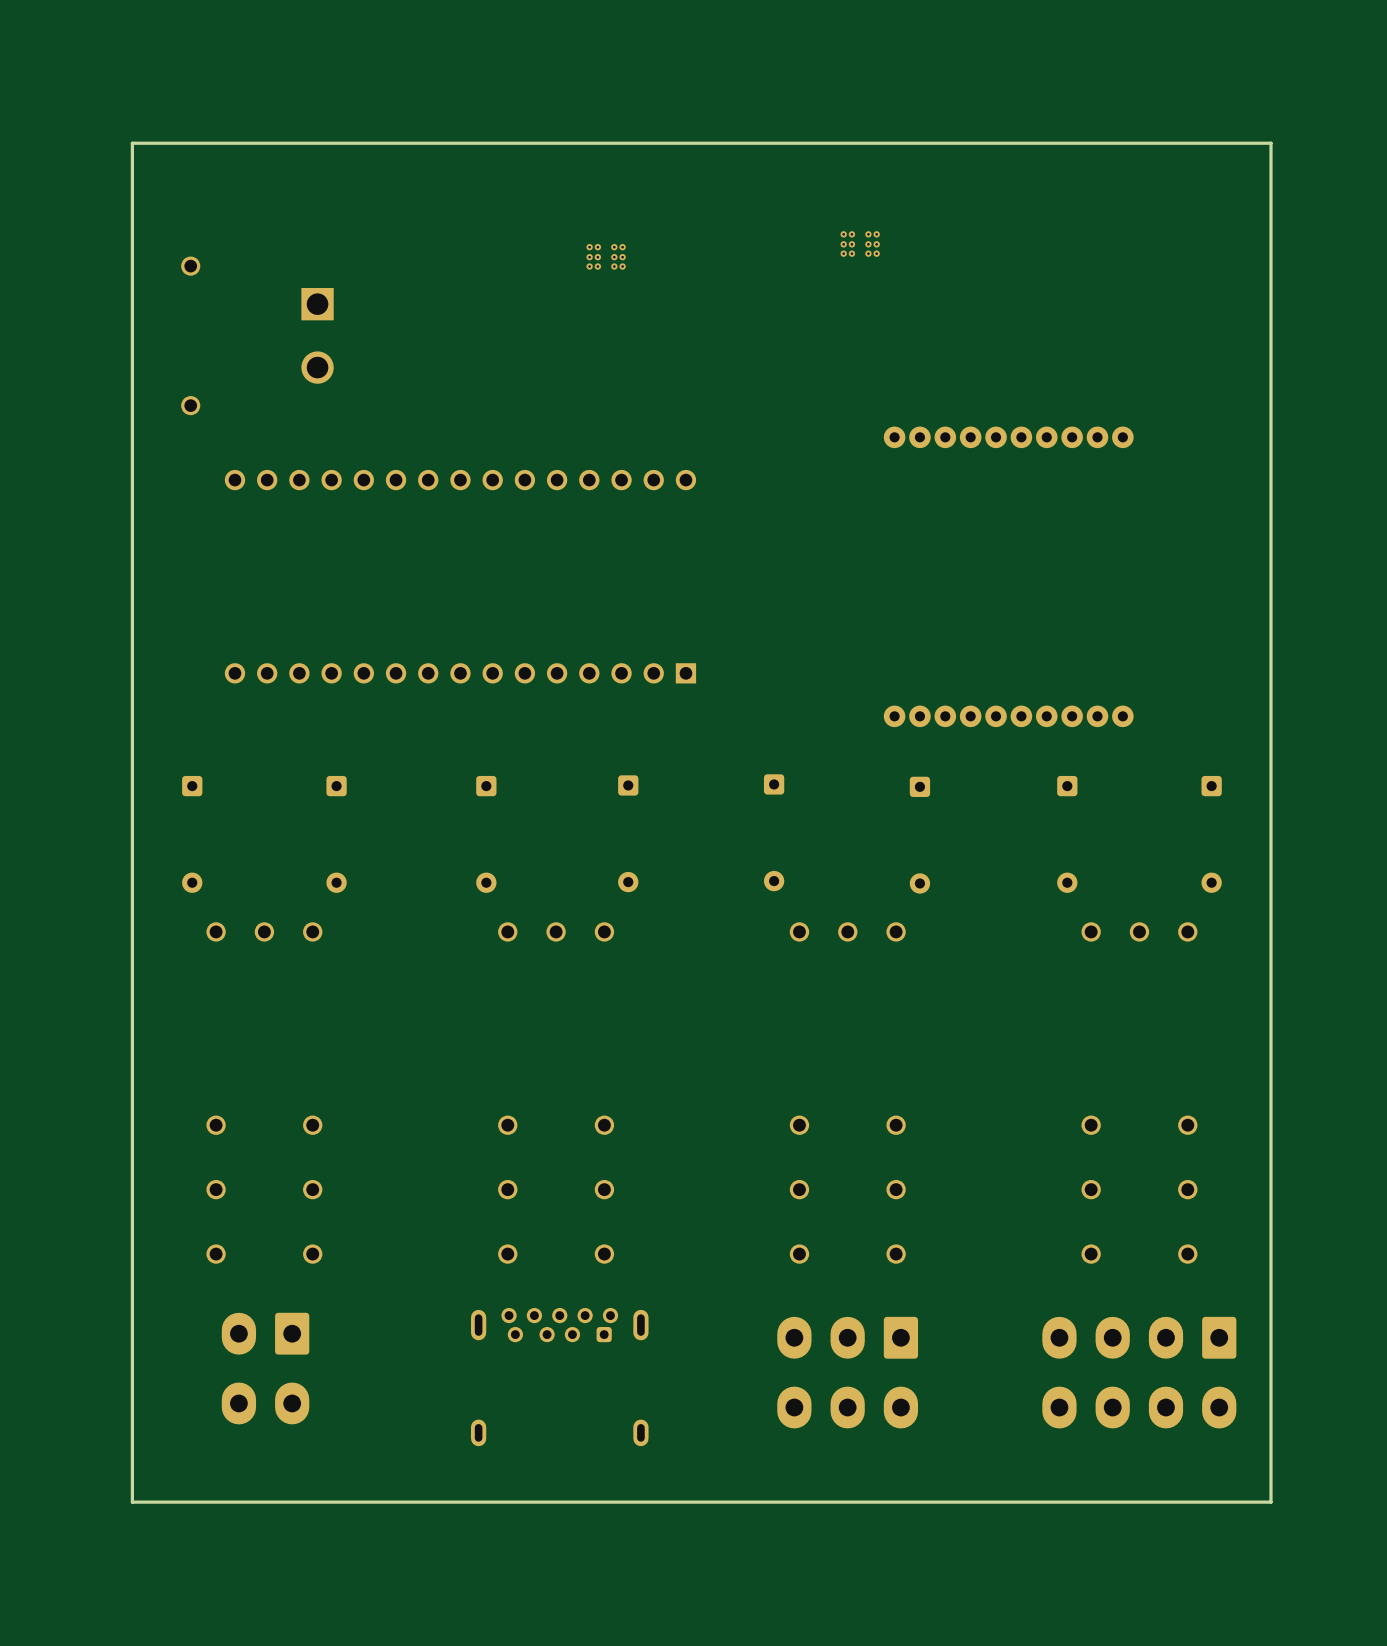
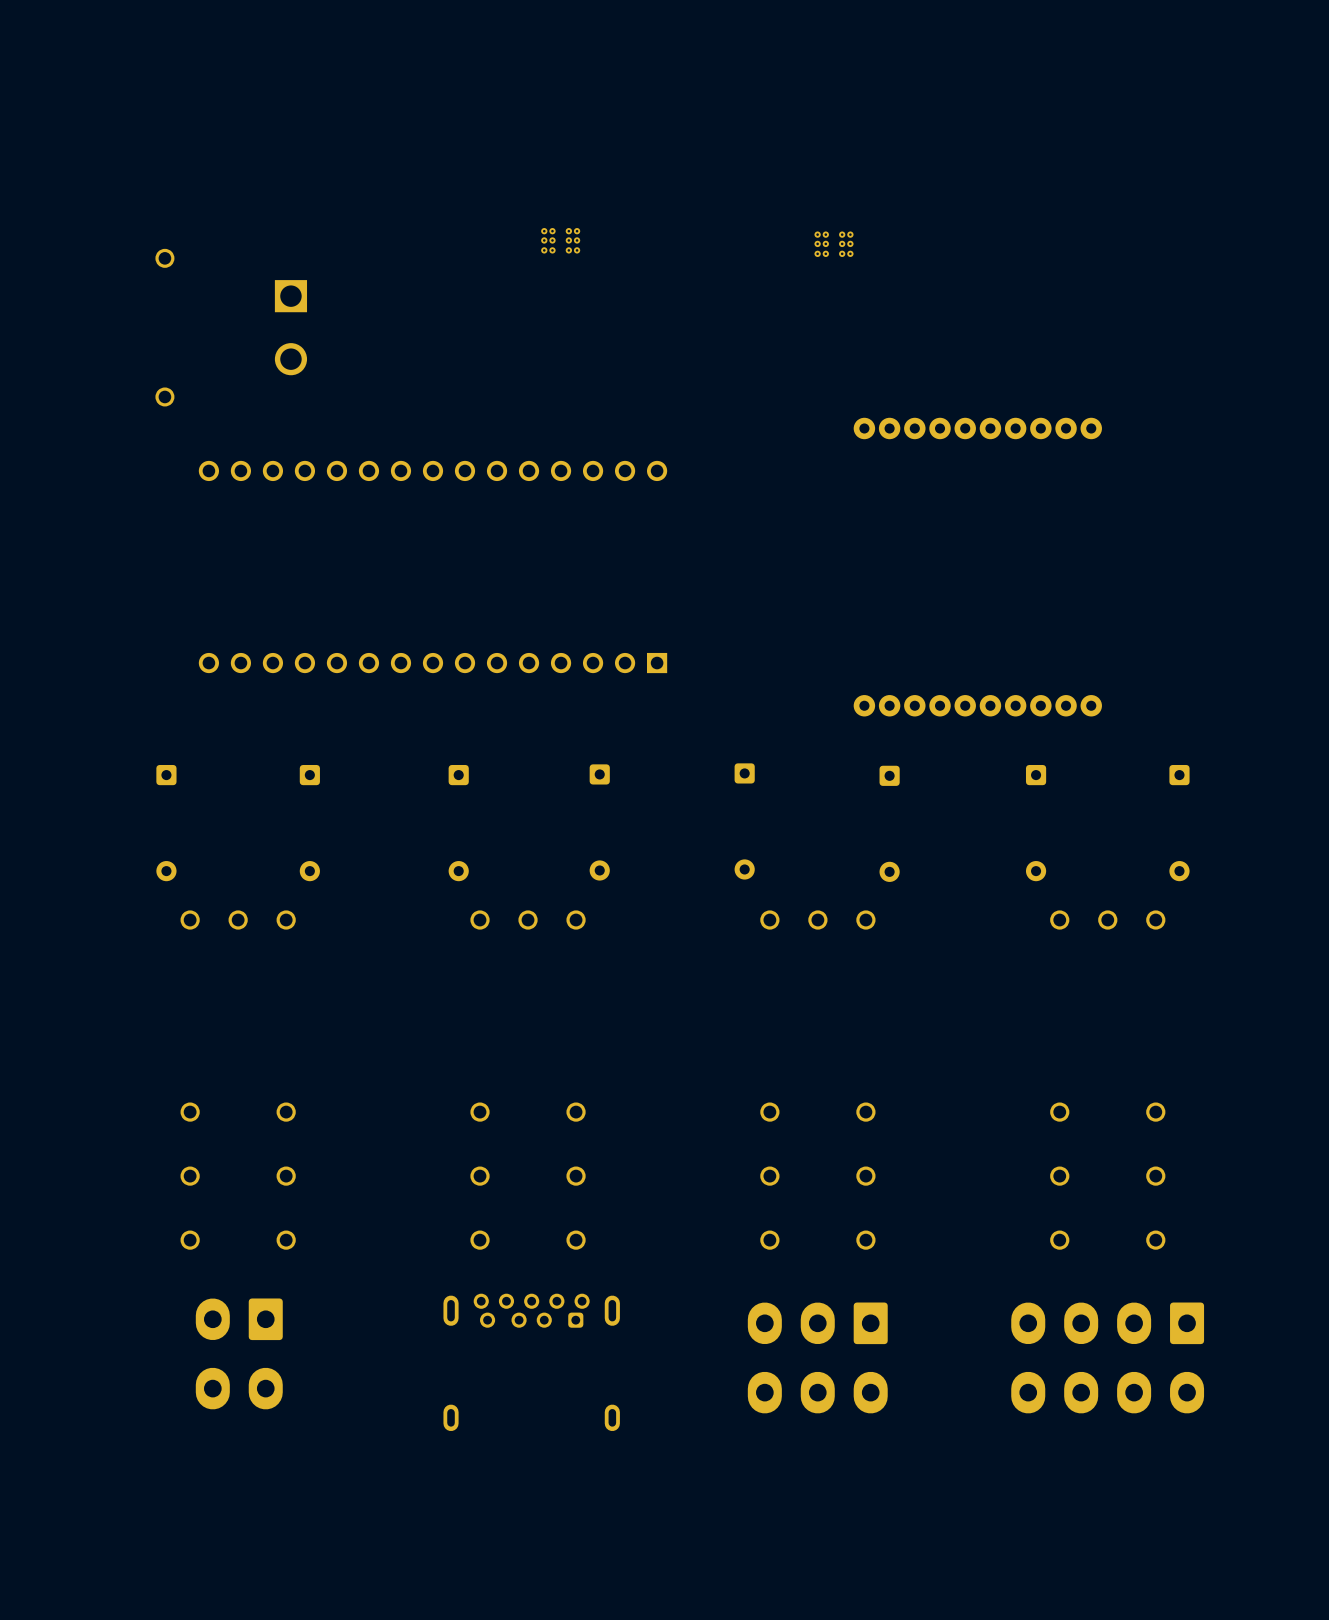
board edge: (1270, 143) (132, 143) (132, 1502) (1270, 1502) (1270, 143) -> none
part rotation: 0° (860, 244) -> 180° (834, 244)
part rotation: 0° (606, 256) -> 180° (560, 240)

